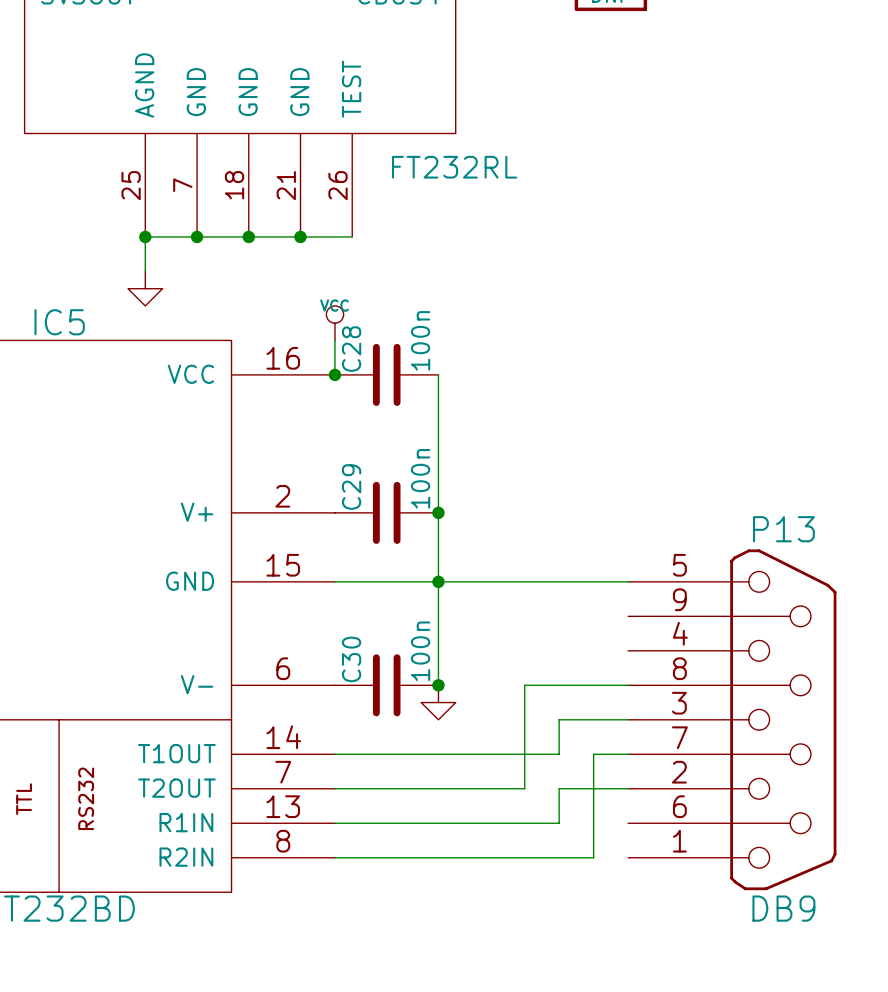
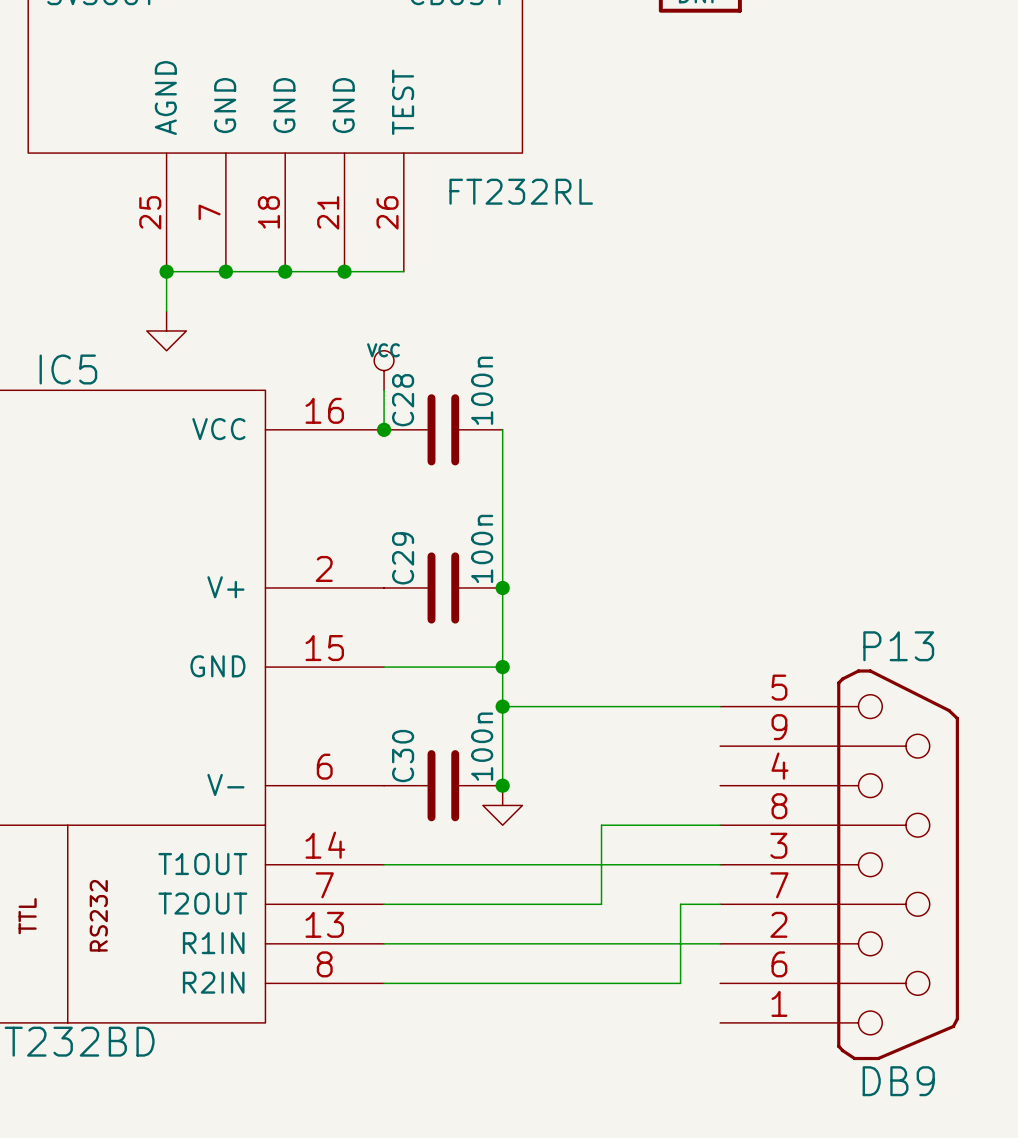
wire: (438, 581) (628, 581) -> (502, 706) (720, 706)
junction: none -> (502, 706)
wire: (628, 685) (524, 685) (524, 719) -> none
wire: (559, 719) (559, 754) -> (641, 825) (601, 825)
P13 position: (732, 719) -> (839, 864)
wire: (593, 754) (593, 788) (559, 788) (559, 823) -> (680, 864) (641, 864)
wire: none -> (641, 943) (720, 943)

